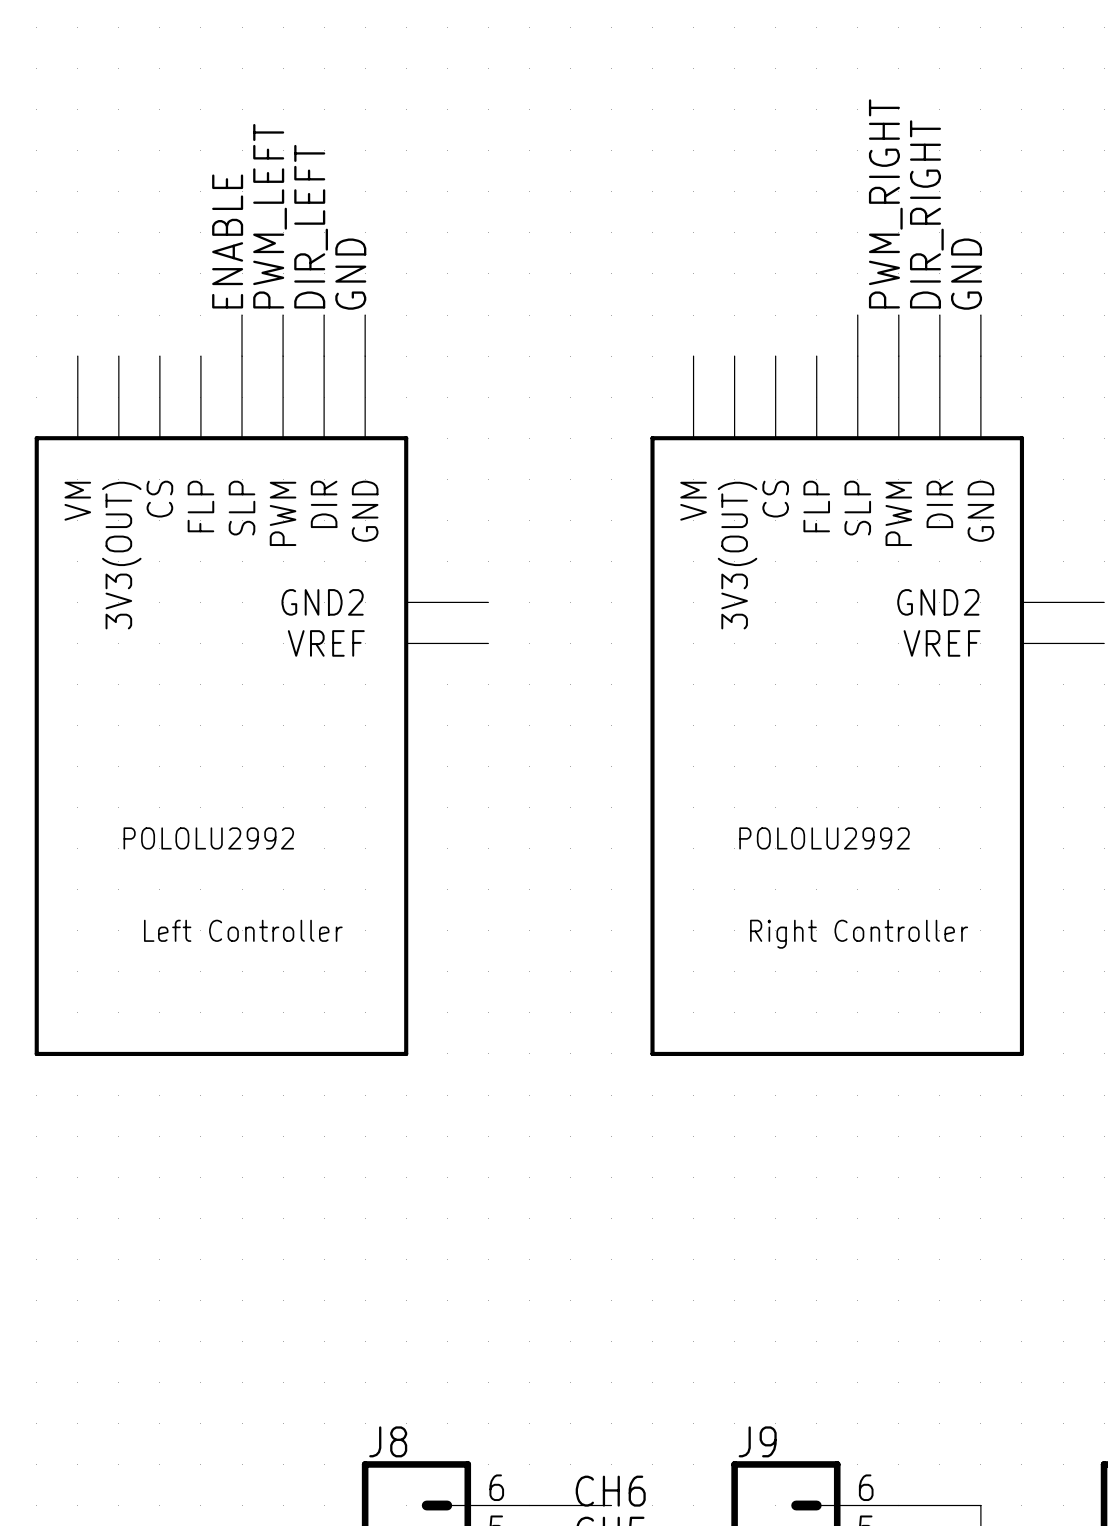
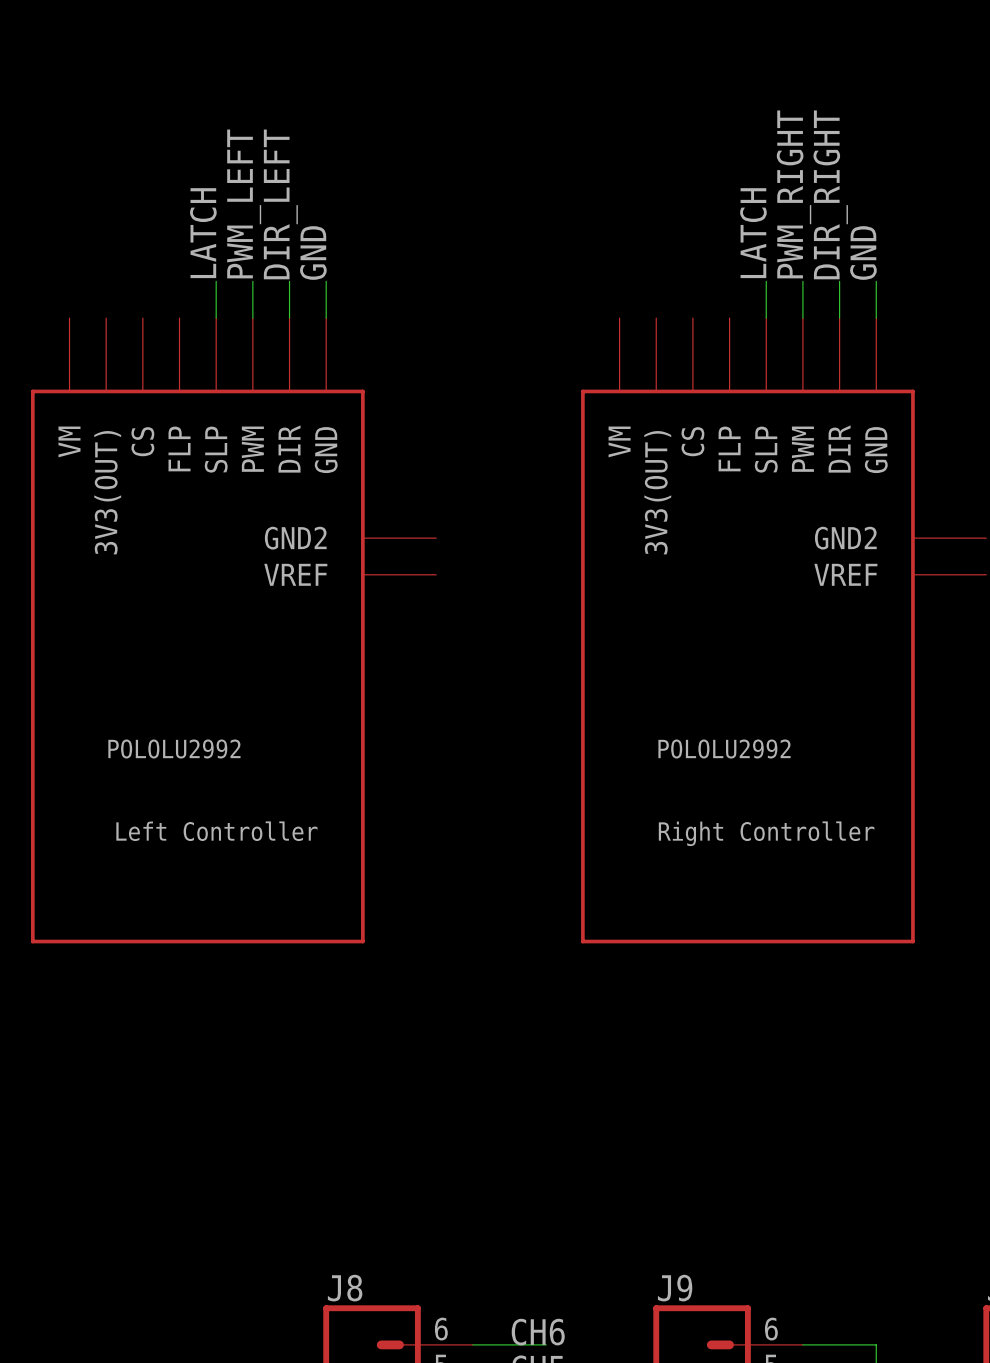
label: ENABLE (227, 241) -> LATCH (203, 233)
label: none -> LATCH (753, 233)

